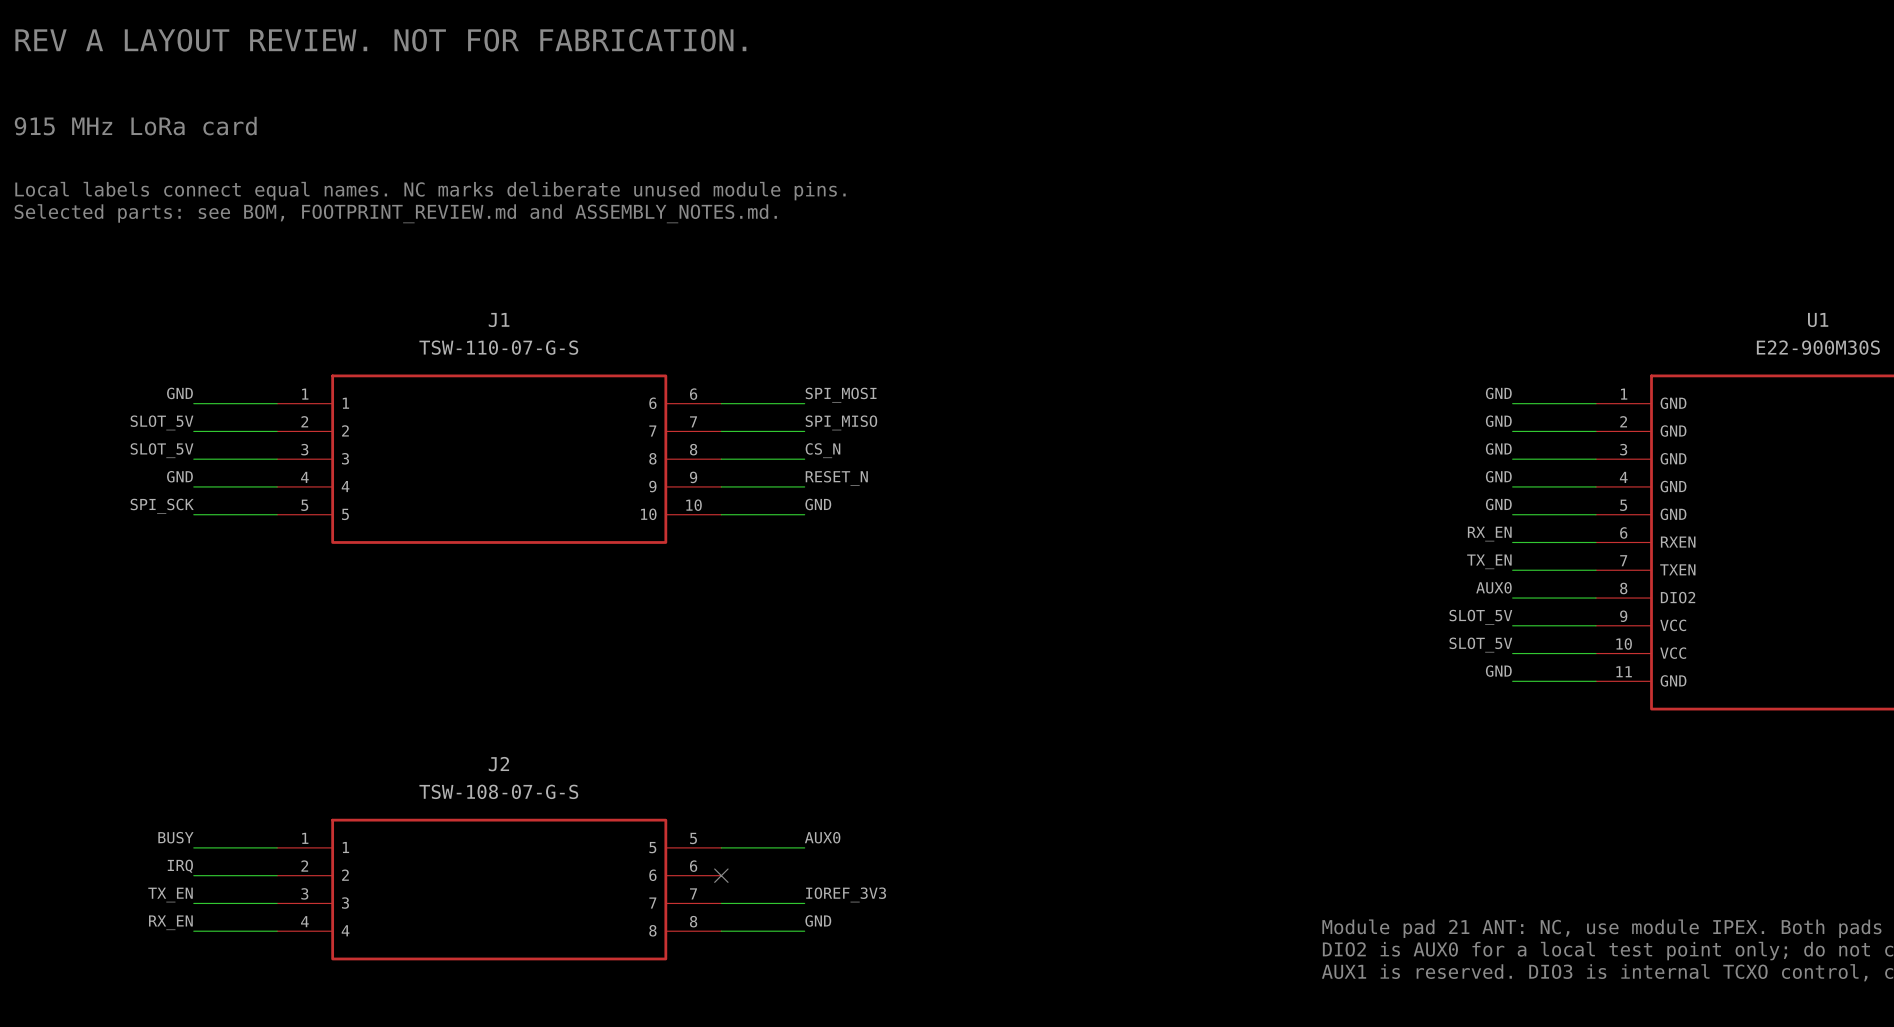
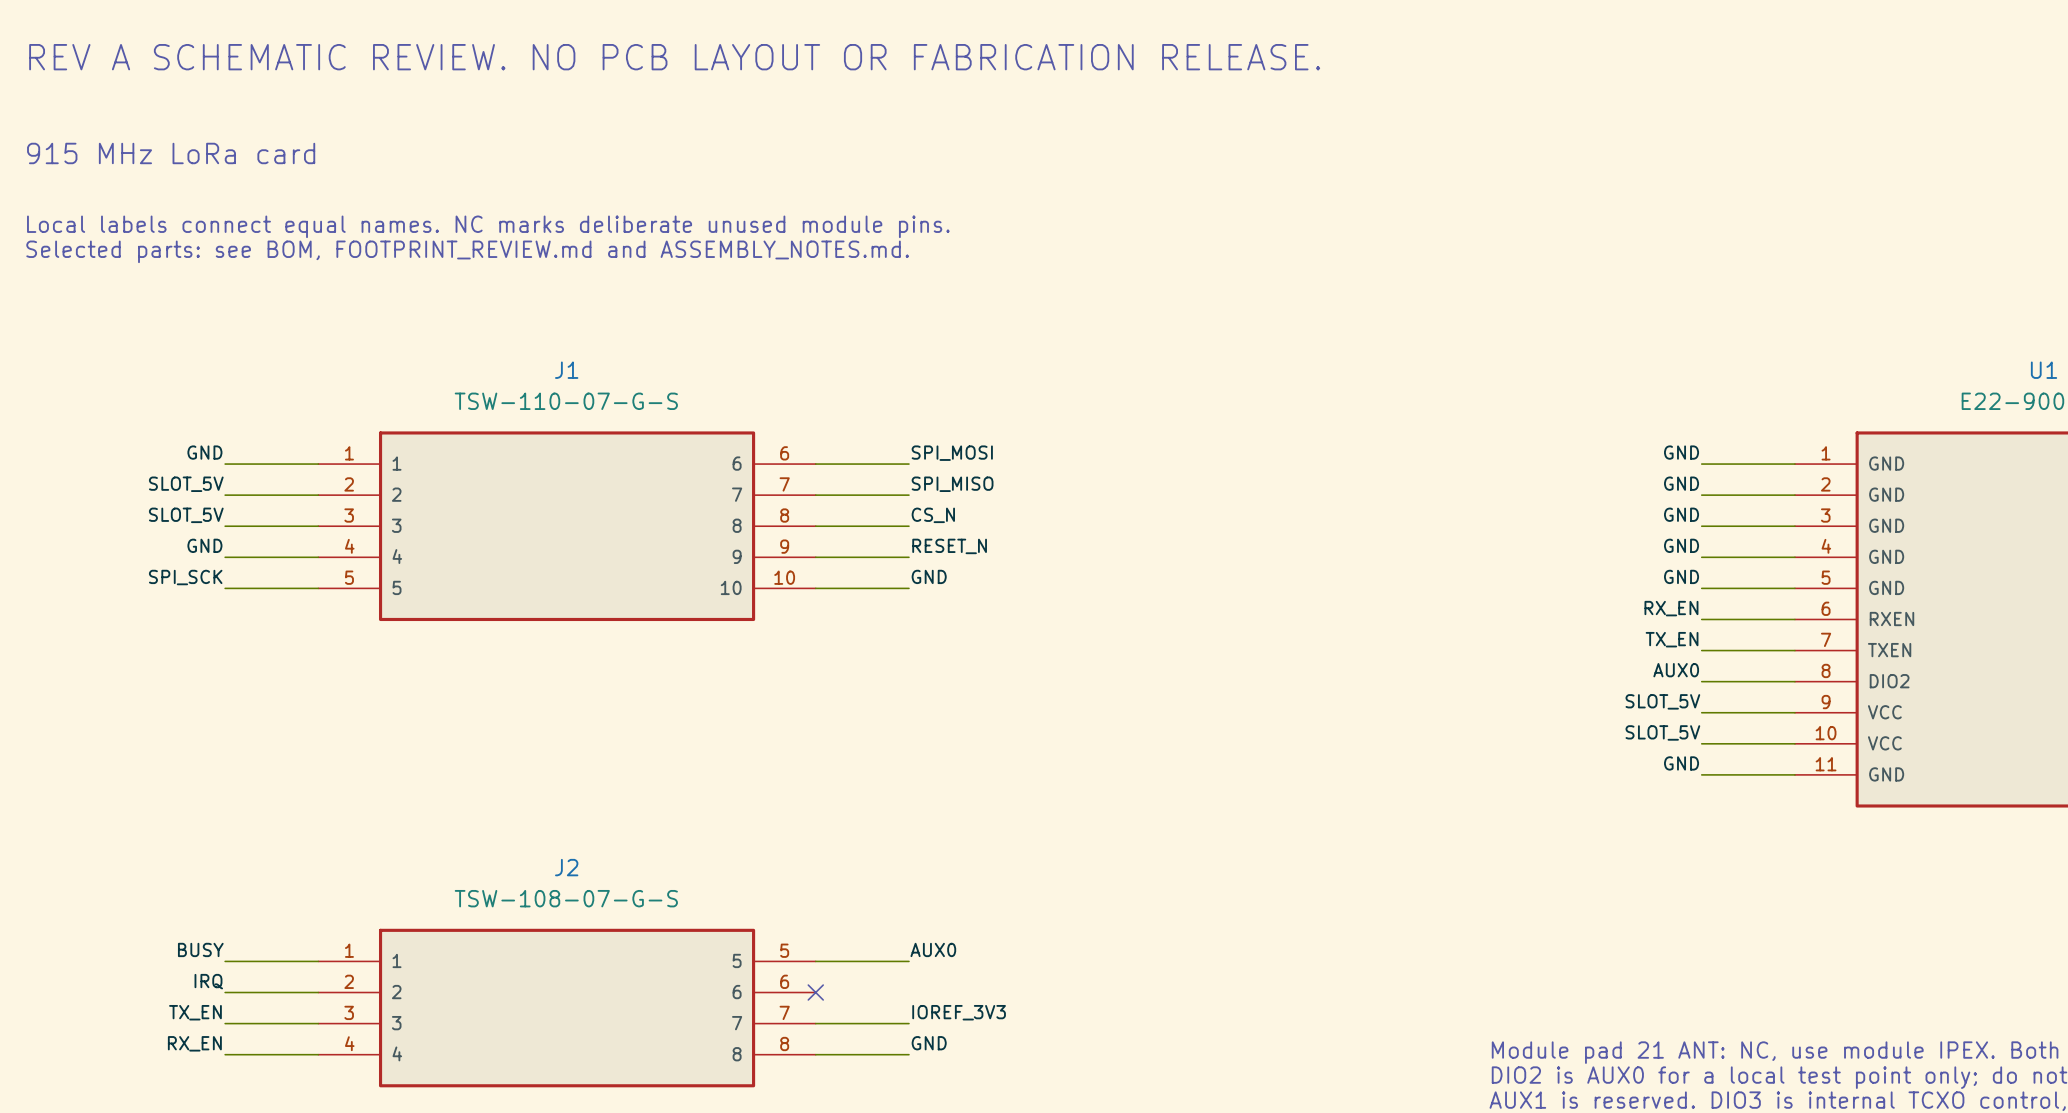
text: REV A LAYOUT REVIEW. NOT FOR FABRICATION. (380, 40) -> REV A SCHEMATIC REVIEW. NO PCB LAYOUT OR FABRICATION RELEASE. (674, 57)

